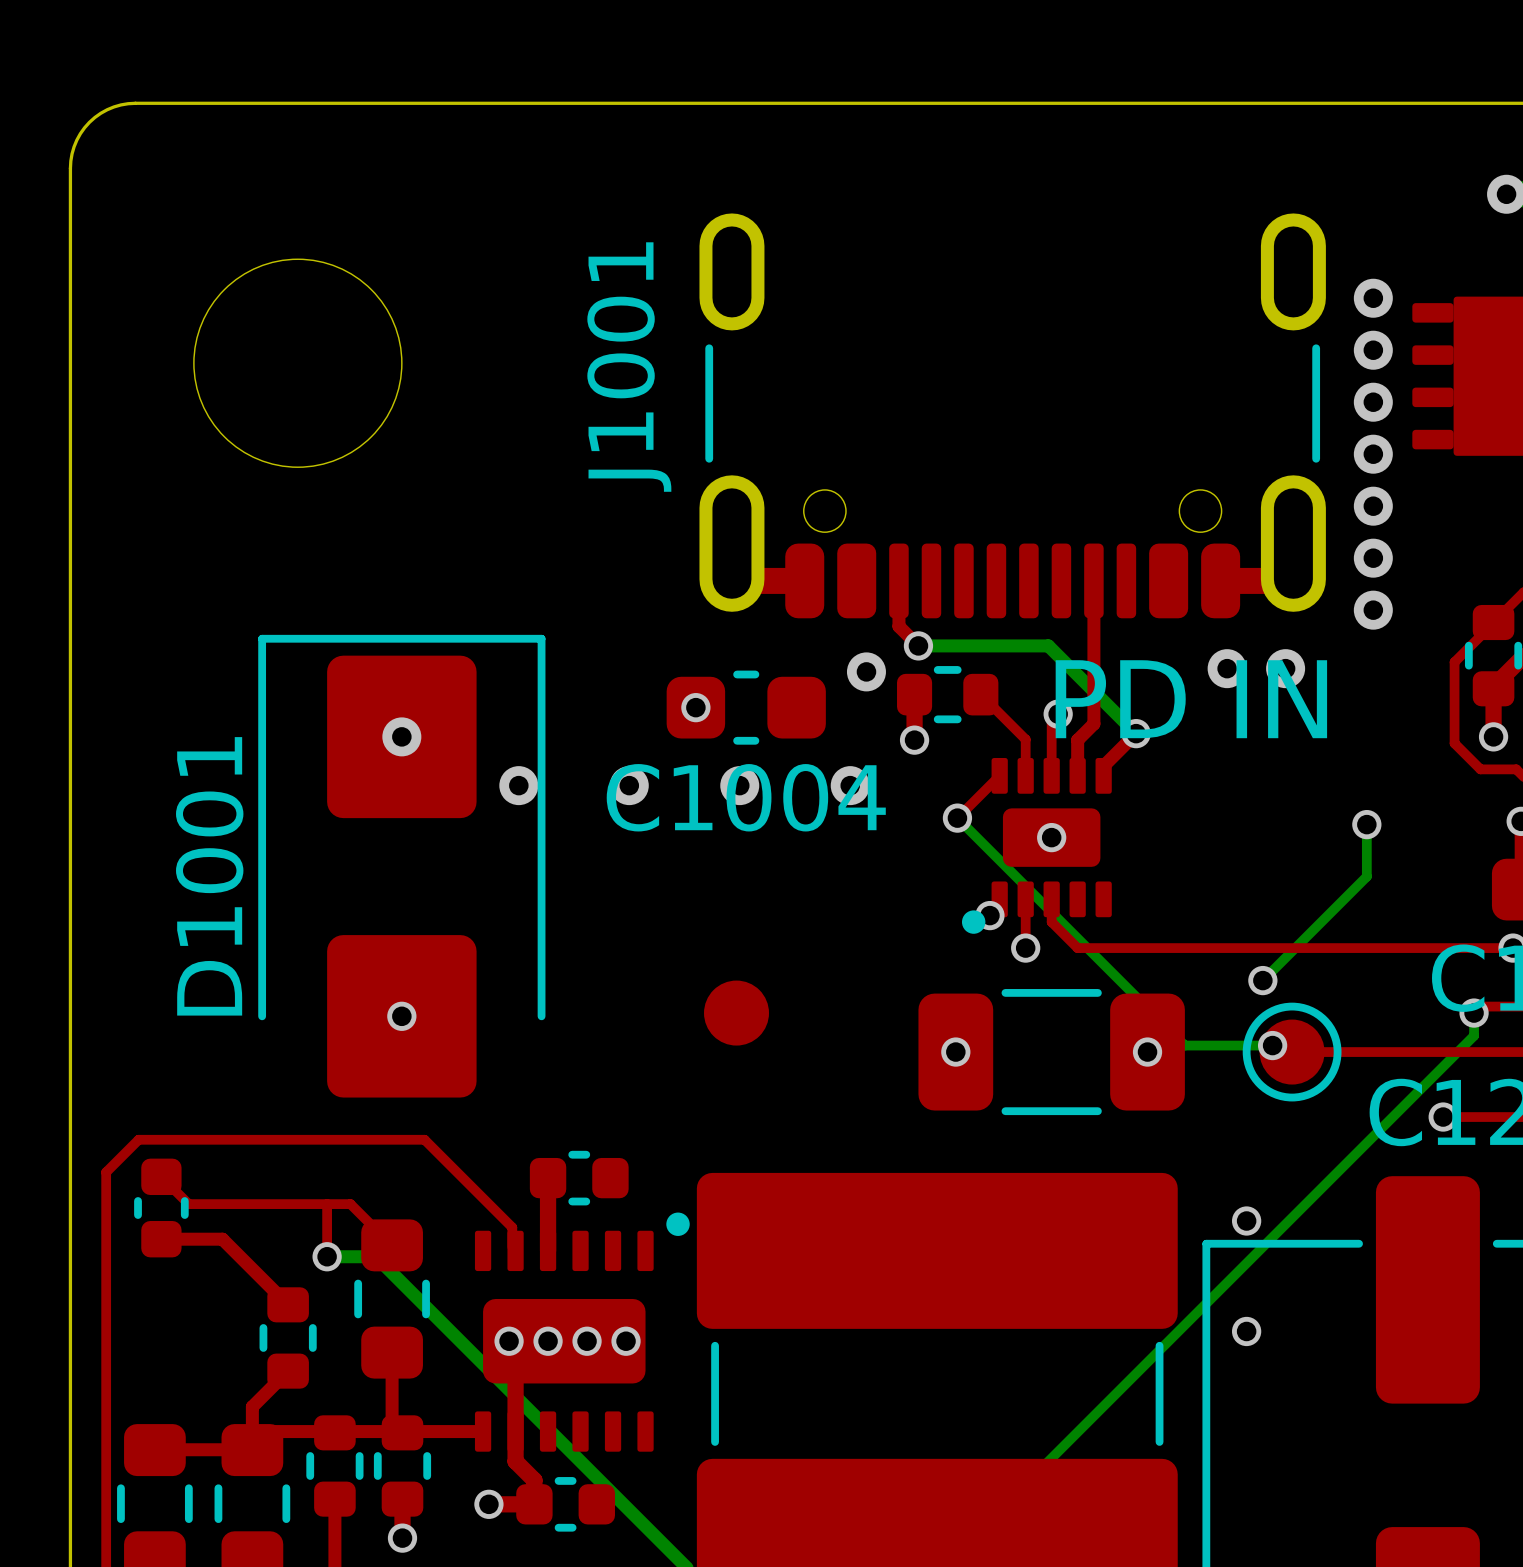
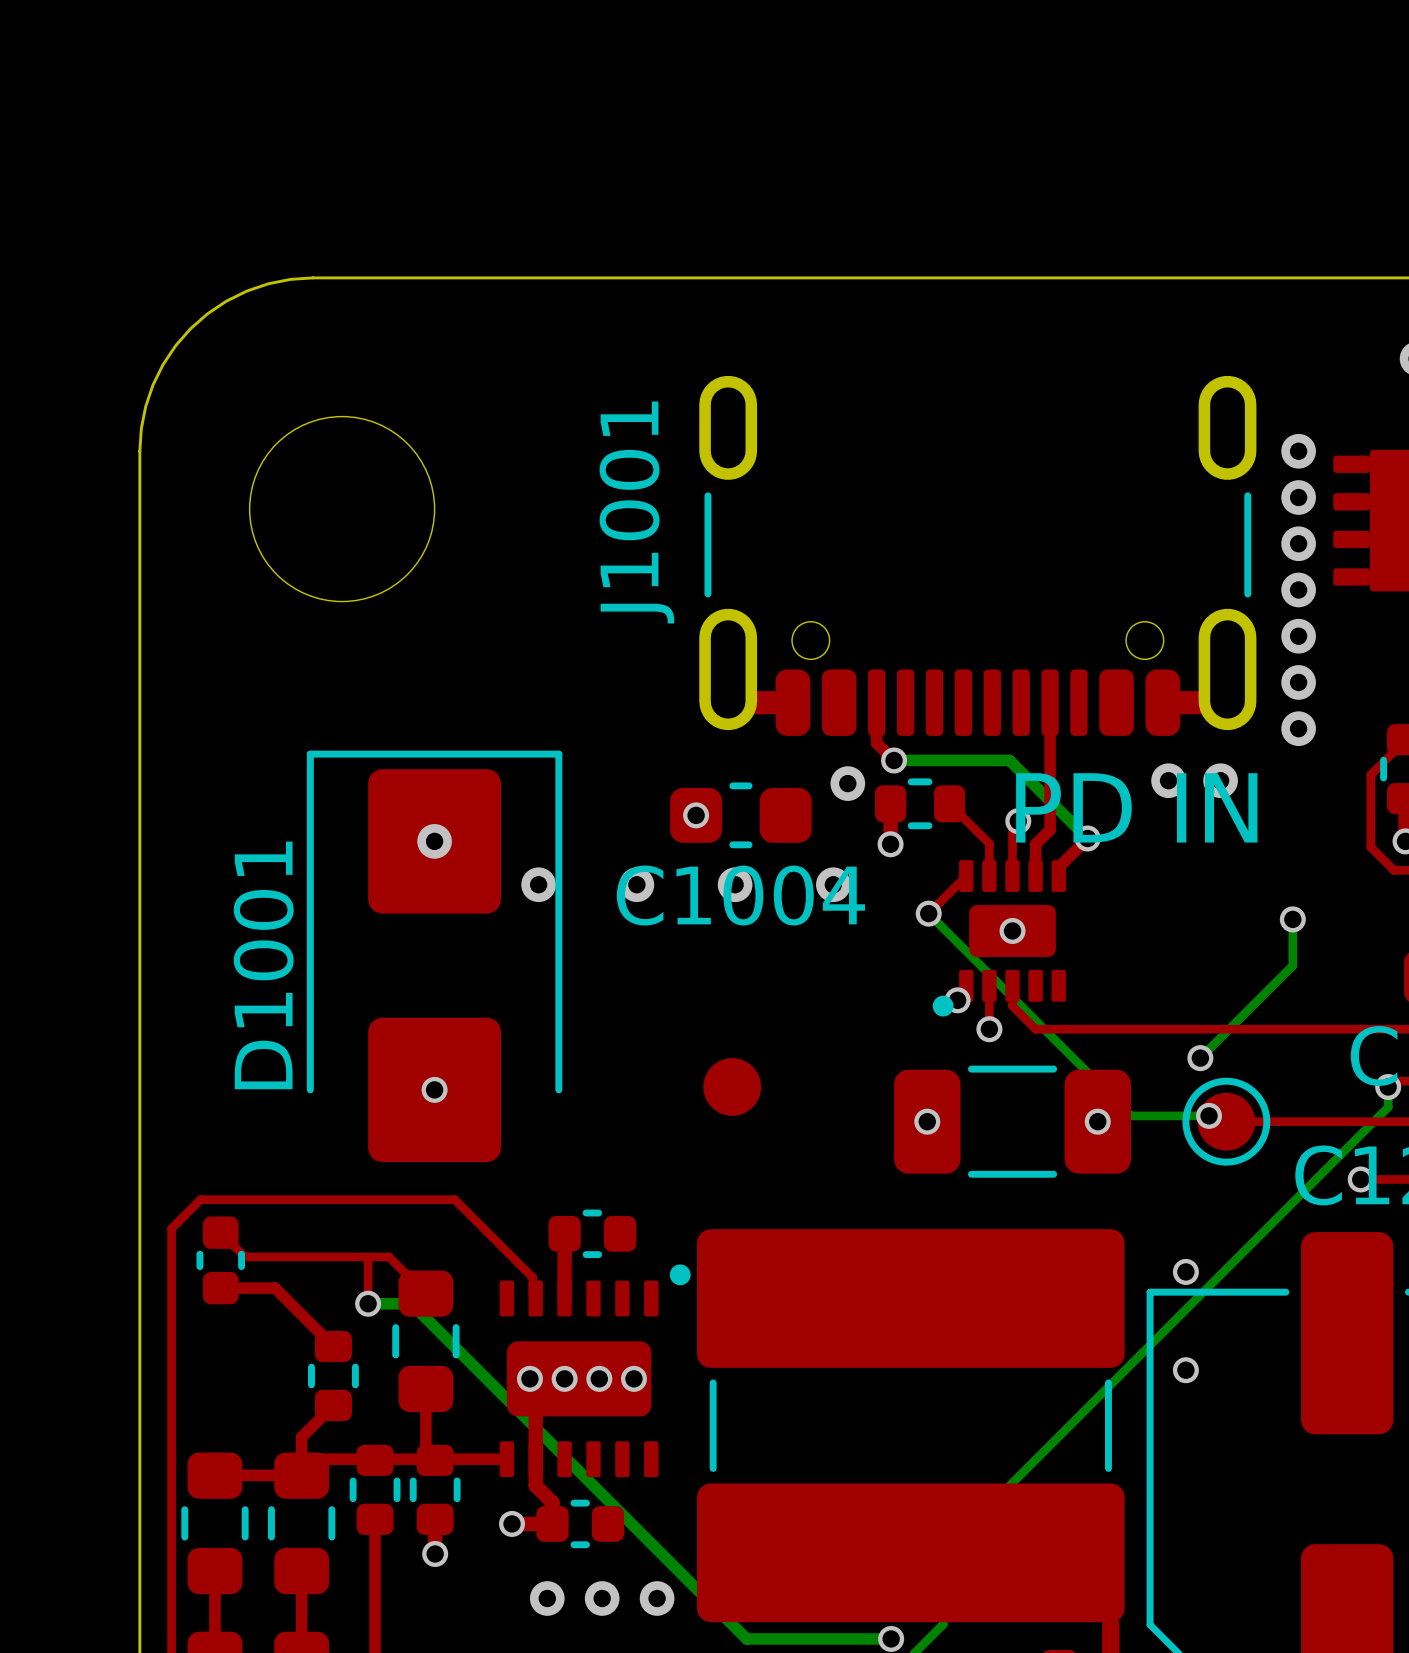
board edge: (265, 103) (128, 103) (107, 109) (89, 122) (76, 140) (70, 161) (70, 298) -> (313, 277) (268, 283) (246, 291) (207, 313) (190, 328) (163, 364) (153, 384) (145, 406) (139, 451)

